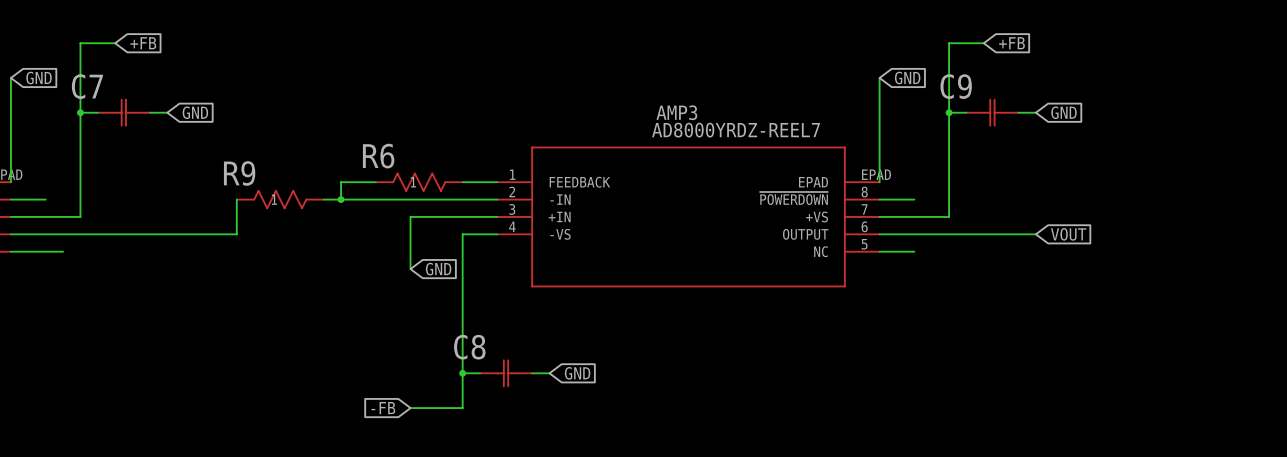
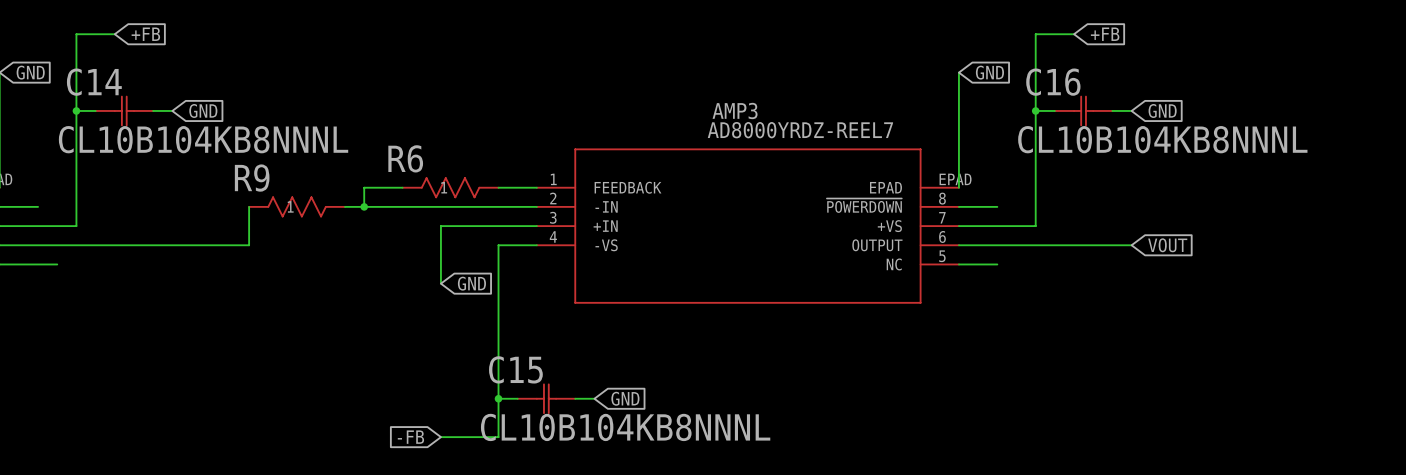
C7 name: C7 (87, 86) -> C14 (94, 82)
C9 name: C9 (956, 86) -> C16 (1053, 82)
C7 value: none -> CL10B104KB8NNNL (203, 139)
C9 value: none -> CL10B104KB8NNNL (1162, 139)
C8 name: C8 (469, 347) -> C15 (515, 369)
C8 value: none -> CL10B104KB8NNNL (625, 427)

